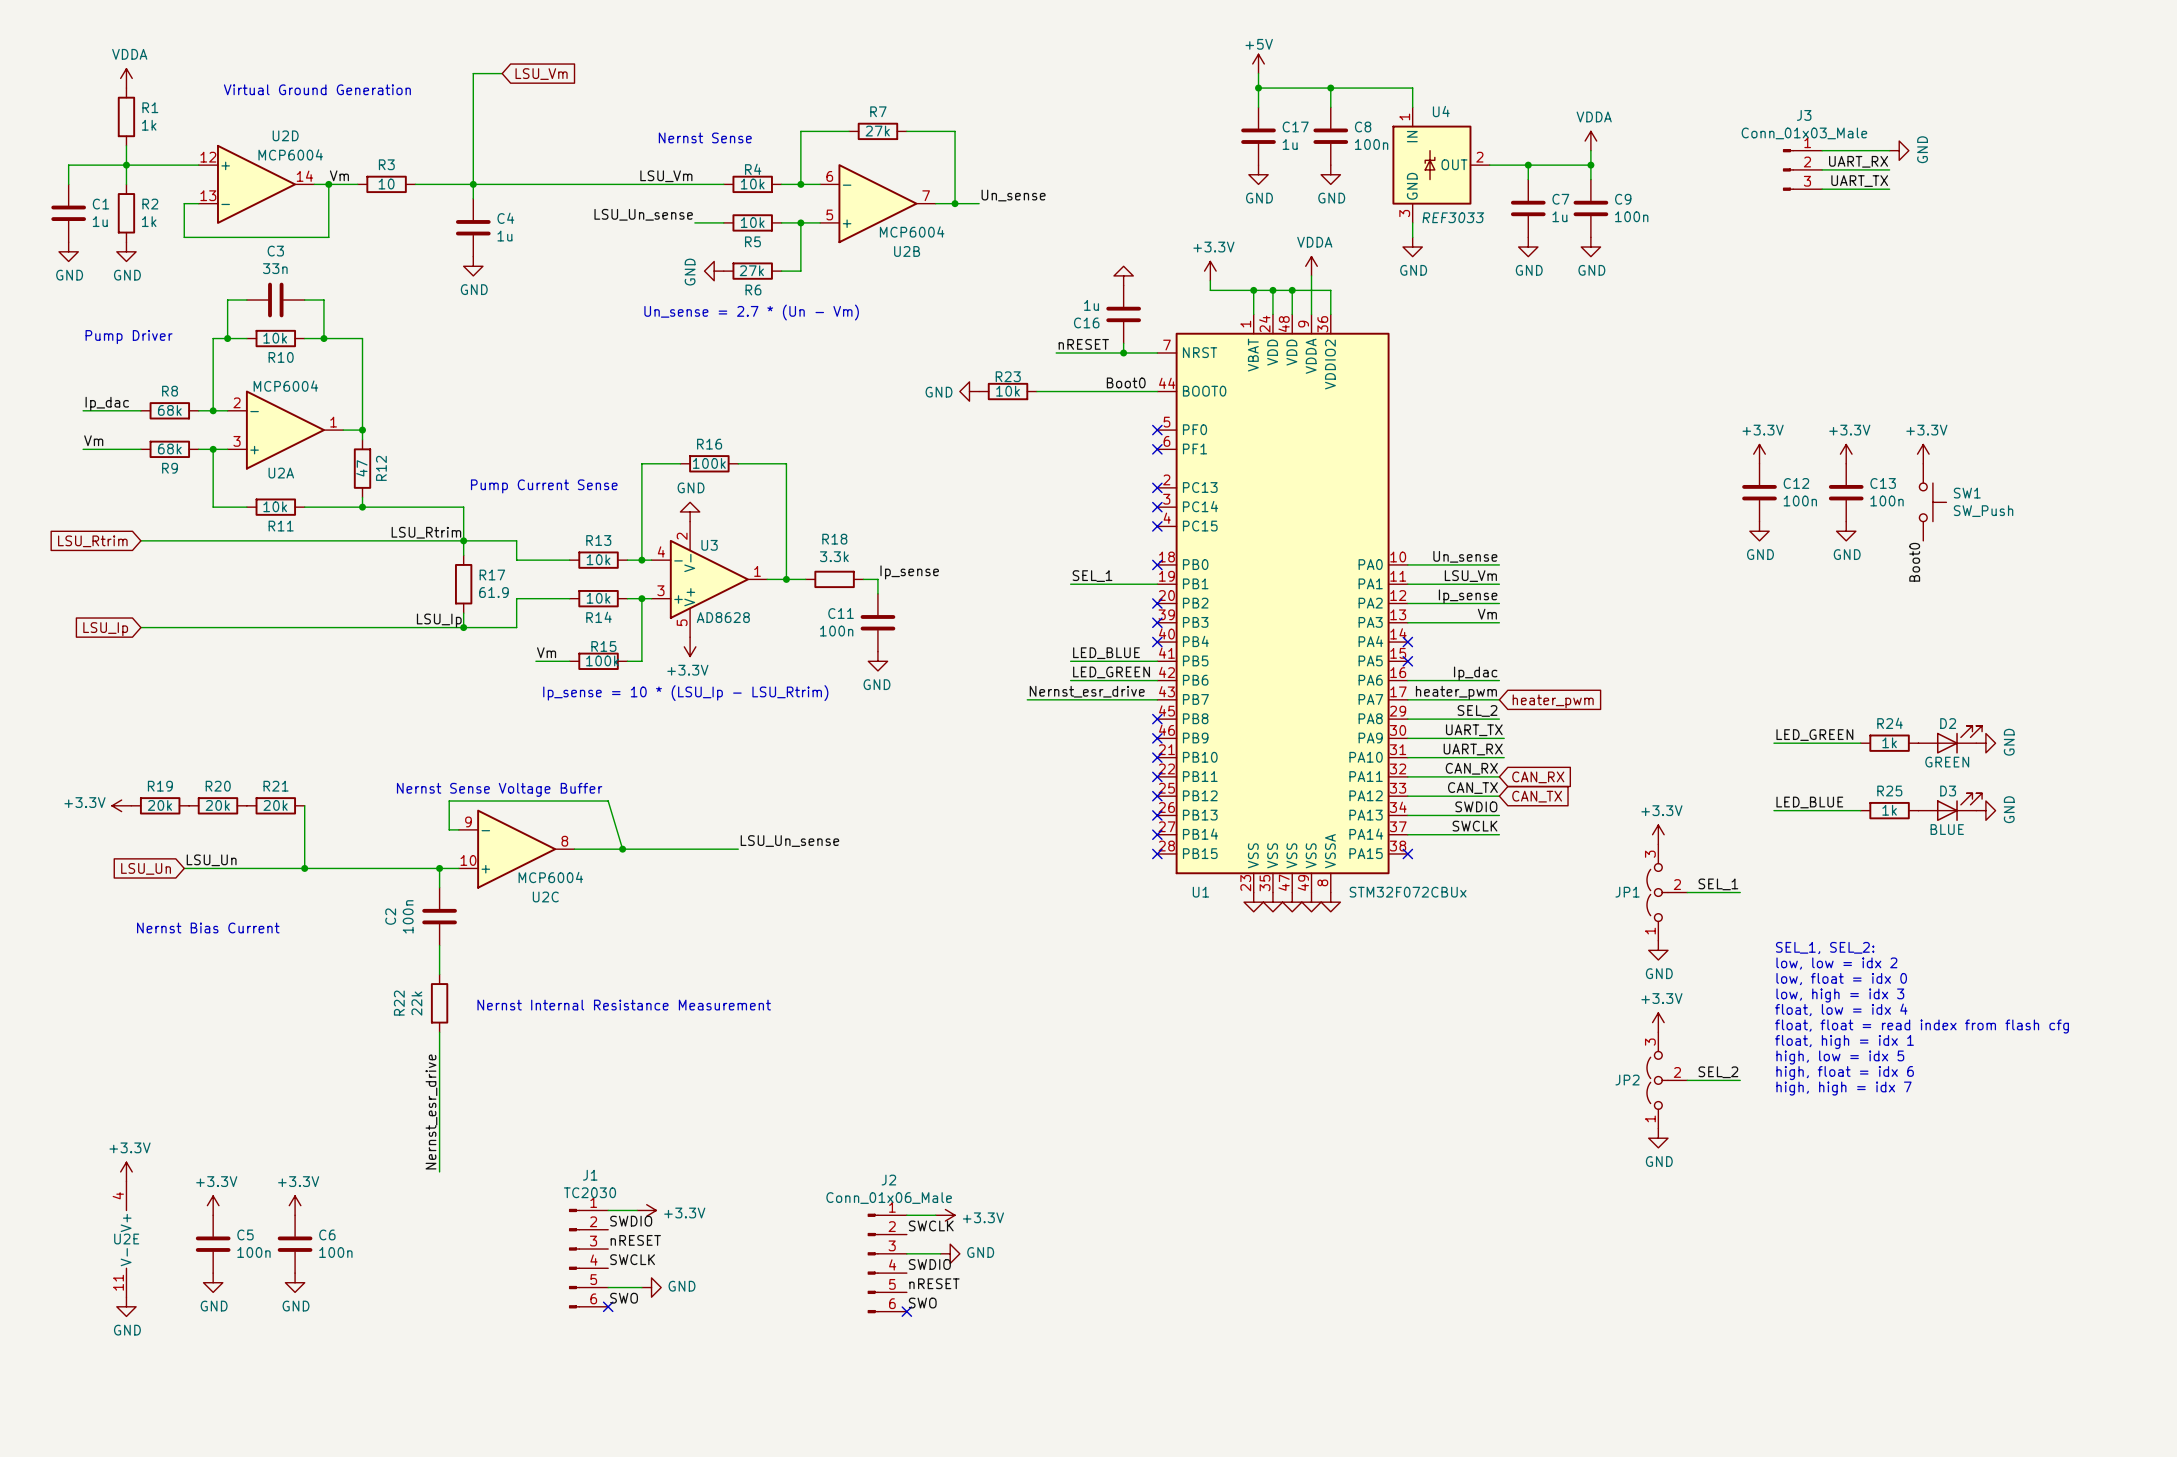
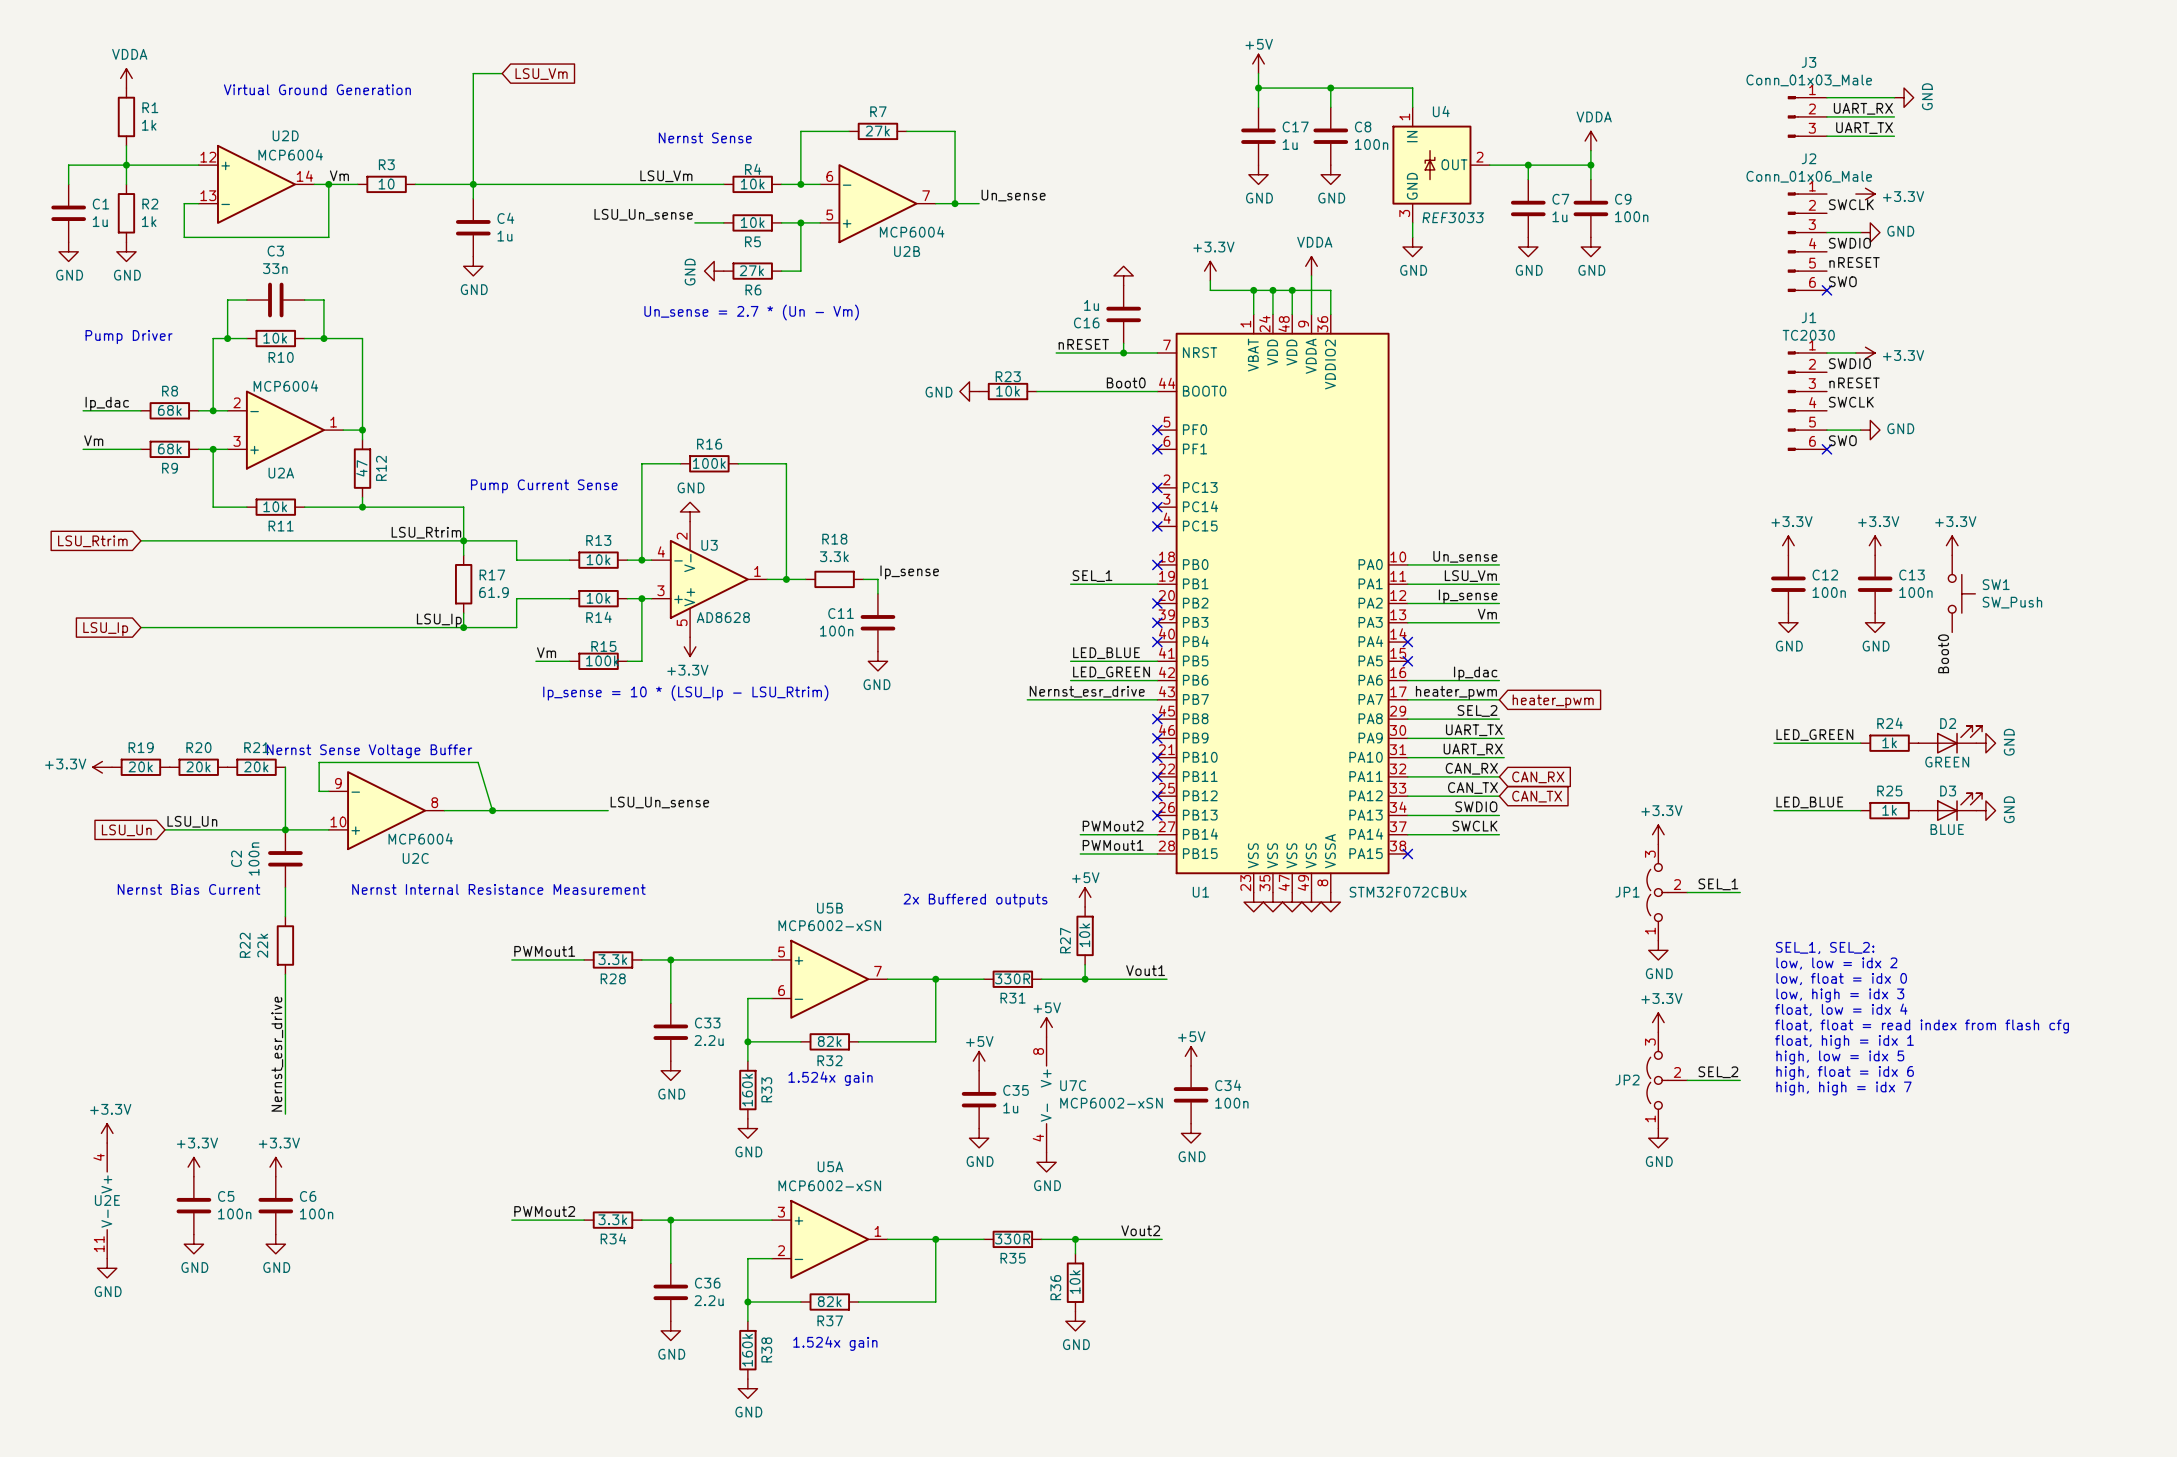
power symbol: none -> GND (1904, 97)
wire: (1822, 150) (1889, 150) -> (1826, 97) (1894, 97)
power symbol: GND (1899, 150) -> none
label position: UART_RX (1858, 161) -> UART_RX (1863, 108)
J3 position: (1802, 169) -> (1807, 116)
wire: (1822, 169) (1889, 169) -> (1826, 116) (1894, 116)
label position: UART_TX (1859, 181) -> UART_TX (1864, 128)
wire: (1822, 189) (1889, 189) -> (1826, 136) (1894, 136)
power symbol: none -> +3.3V (1865, 194)
label: none -> SWCLK (1851, 204)
wire: none -> (1826, 232) (1860, 232)
power symbol: none -> GND (1870, 232)
label: none -> SWDIO (1849, 243)
label: none -> nRESET (1854, 262)
label: none -> SWO (1842, 281)
no-connect mark: none -> (1826, 290)
wire: none -> (1826, 352) (1855, 352)
power symbol: none -> +3.3V (1865, 352)
label: none -> SWDIO (1849, 363)
label: none -> nRESET (1854, 382)
label: none -> SWCLK (1851, 402)
wire: none -> (1826, 430) (1860, 430)
power symbol: none -> GND (1870, 430)
label: none -> SWO (1842, 440)
no-connect mark: none -> (1826, 449)
power symbol: +3.3V (1759, 454) -> none
power symbol: +3.3V (1846, 454) -> none
power symbol: +3.3V (1923, 454) -> none
C12 position: (1759, 492) -> (1788, 584)
C13 position: (1846, 492) -> (1875, 584)
SW1 position: (1932, 502) -> (1961, 593)
power symbol: GND (1759, 531) -> none
power symbol: GND (1846, 531) -> none
power symbol: none -> +3.3V (1788, 545)
power symbol: none -> +3.3V (1875, 545)
power symbol: none -> +3.3V (1952, 545)
label position: Boot0 (1914, 562) -> Boot0 (1943, 653)
power symbol: none -> GND (1788, 622)
power symbol: none -> GND (1875, 622)
text position: Nernst Sense Voltage Buffer (499, 789) -> Nernst Sense Voltage Buffer (369, 751)
power symbol position: +3.3V (121, 805) -> +3.3V (102, 767)
R19 position: (160, 805) -> (140, 767)
R20 position: (217, 805) -> (198, 767)
R21 position: (275, 805) -> (256, 767)
wire: (304, 805) (304, 868) -> (285, 767) (285, 829)
junction: none -> (492, 810)
label: none -> PWMout2 (1113, 826)
wire: none -> (164, 829) (328, 829)
wire: (458, 829) (449, 829) (449, 801) (608, 801) (622, 849) -> (328, 791) (319, 791) (319, 762) (478, 762) (492, 810)
wire: none -> (1080, 834) (1157, 834)
no-connect mark: (1157, 834) -> none
label position: LSU_Un_sense (789, 841) -> LSU_Un_sense (659, 802)
label: none -> PWMout1 (1113, 845)
U2C position: (516, 849) -> (386, 810)
wire: (574, 849) (738, 849) -> (444, 810) (608, 810)
junction: (622, 849) -> none
wire: none -> (1080, 853) (1157, 853)
no-connect mark: (1157, 853) -> none
label position: LSU_Un (211, 860) -> LSU_Un (192, 821)
global label position: LSU_Un (146, 868) -> LSU_Un (126, 830)
wire: (184, 868) (458, 868) -> none
junction position: (304, 868) -> (285, 829)
wire: (439, 868) (439, 887) -> none
junction: (439, 868) -> none
power symbol: none -> +5V (1085, 897)
text: none -> 2x Buffered outputs (975, 900)
C2 position: (439, 916) -> (285, 858)
text position: Nernst Bias Current (208, 927) -> Nernst Bias Current (189, 889)
R27: none -> 10k (1085, 935)
wire: (439, 945) (439, 974) -> (285, 887) (285, 916)
label: none -> PWMout1 (544, 951)
wire: none -> (511, 959) (584, 959)
R28: none -> 3.3k (613, 959)
wire: none -> (641, 959) (771, 959)
wire: none -> (670, 959) (670, 1003)
junction: none -> (670, 959)
wire: none -> (1085, 964) (1085, 979)
label: none -> Vout1 (1145, 970)
U5B: none -> MCP6002-xSN (829, 979)
wire: none -> (887, 979) (983, 979)
wire: none -> (935, 979) (935, 1041) (858, 1041)
junction: none -> (935, 979)
R31: none -> 330R (1012, 979)
wire: none -> (1041, 979) (1166, 979)
junction: none -> (1085, 979)
wire: none -> (771, 998) (747, 998) (747, 1061)
R22 position: (439, 1003) -> (285, 945)
text position: Nernst Internal Resistance Measurement (624, 1005) -> Nernst Internal Resistance Measurement (498, 889)
power symbol: none -> +5V (1046, 1027)
wire: (439, 1032) (439, 1171) -> (285, 974) (285, 1114)
C33: none -> 2.2u (670, 1032)
wire: none -> (747, 1041) (800, 1041)
junction: none -> (747, 1041)
R32: none -> 82k (829, 1041)
power symbol: none -> +5V (1191, 1056)
power symbol: none -> +5V (979, 1061)
power symbol: none -> GND (670, 1070)
text: none -> 1.524x gain (830, 1078)
R33: none -> 160k (747, 1090)
U7C: none -> MCP6002-xSN (1046, 1094)
C34: none -> 100n (1191, 1094)
C35: none -> 1u (979, 1099)
label position: Nernst_esr_drive (431, 1111) -> Nernst_esr_drive (277, 1054)
power symbol: none -> GND (747, 1128)
power symbol: none -> +3.3V (107, 1133)
power symbol: none -> GND (1191, 1133)
power symbol: none -> GND (979, 1138)
power symbol: none -> GND (1046, 1162)
power symbol: none -> +3.3V (193, 1167)
power symbol: none -> +3.3V (275, 1167)
power symbol: +3.3V (126, 1171) -> none
power symbol: +3.3V (213, 1205) -> none
power symbol: +3.3V (295, 1205) -> none
wire: (608, 1210) (637, 1210) -> none
power symbol: +3.3V (646, 1210) -> none
label: none -> PWMout2 (544, 1211)
wire: (906, 1215) (935, 1215) -> none
power symbol: +3.3V (945, 1215) -> none
wire: none -> (511, 1220) (584, 1220)
R34: none -> 3.3k (613, 1220)
wire: none -> (641, 1220) (771, 1220)
wire: none -> (670, 1220) (670, 1263)
junction: none -> (670, 1220)
label: SWDIO (631, 1221) -> none
label: SWCLK (931, 1225) -> none
label: none -> Vout2 (1140, 1230)
U2E position: (126, 1239) -> (107, 1200)
U5A: none -> MCP6002-xSN (829, 1239)
wire: none -> (887, 1239) (983, 1239)
wire: none -> (935, 1239) (935, 1301) (858, 1301)
junction: none -> (935, 1239)
R35: none -> 330R (1012, 1239)
wire: none -> (1041, 1239) (1162, 1239)
wire: none -> (1075, 1239) (1075, 1253)
junction: none -> (1075, 1239)
label: nRESET (635, 1240) -> none
power symbol: none -> GND (193, 1244)
C5 position: (213, 1244) -> (193, 1205)
power symbol: none -> GND (275, 1244)
C6 position: (295, 1244) -> (275, 1205)
wire: (906, 1253) (940, 1253) -> none
power symbol: GND (950, 1253) -> none
J1 position: (588, 1258) -> (1807, 401)
wire: none -> (771, 1258) (747, 1258) (747, 1321)
label: SWCLK (632, 1259) -> none
J2 position: (887, 1263) -> (1807, 242)
label: SWDIO (929, 1264) -> none
power symbol: GND (213, 1282) -> none
power symbol: GND (295, 1282) -> none
R36: none -> 10k (1075, 1282)
label: nRESET (934, 1283) -> none
wire: (608, 1287) (641, 1287) -> none
power symbol rotation: 0° (651, 1287) -> 90° clockwise (670, 1330)
power symbol position: GND (651, 1287) -> GND (670, 1330)
C36: none -> 2.2u (670, 1292)
label: SWO (624, 1298) -> none
wire: none -> (747, 1301) (800, 1301)
junction: none -> (747, 1301)
R37: none -> 82k (829, 1301)
label: SWO (922, 1303) -> none
power symbol position: GND (126, 1306) -> GND (107, 1268)
no-connect mark: (608, 1306) -> none
no-connect mark: (906, 1311) -> none
power symbol: none -> GND (1075, 1321)
text: none -> 1.524x gain (835, 1343)
R38: none -> 160k (747, 1350)
power symbol: none -> GND (747, 1388)

